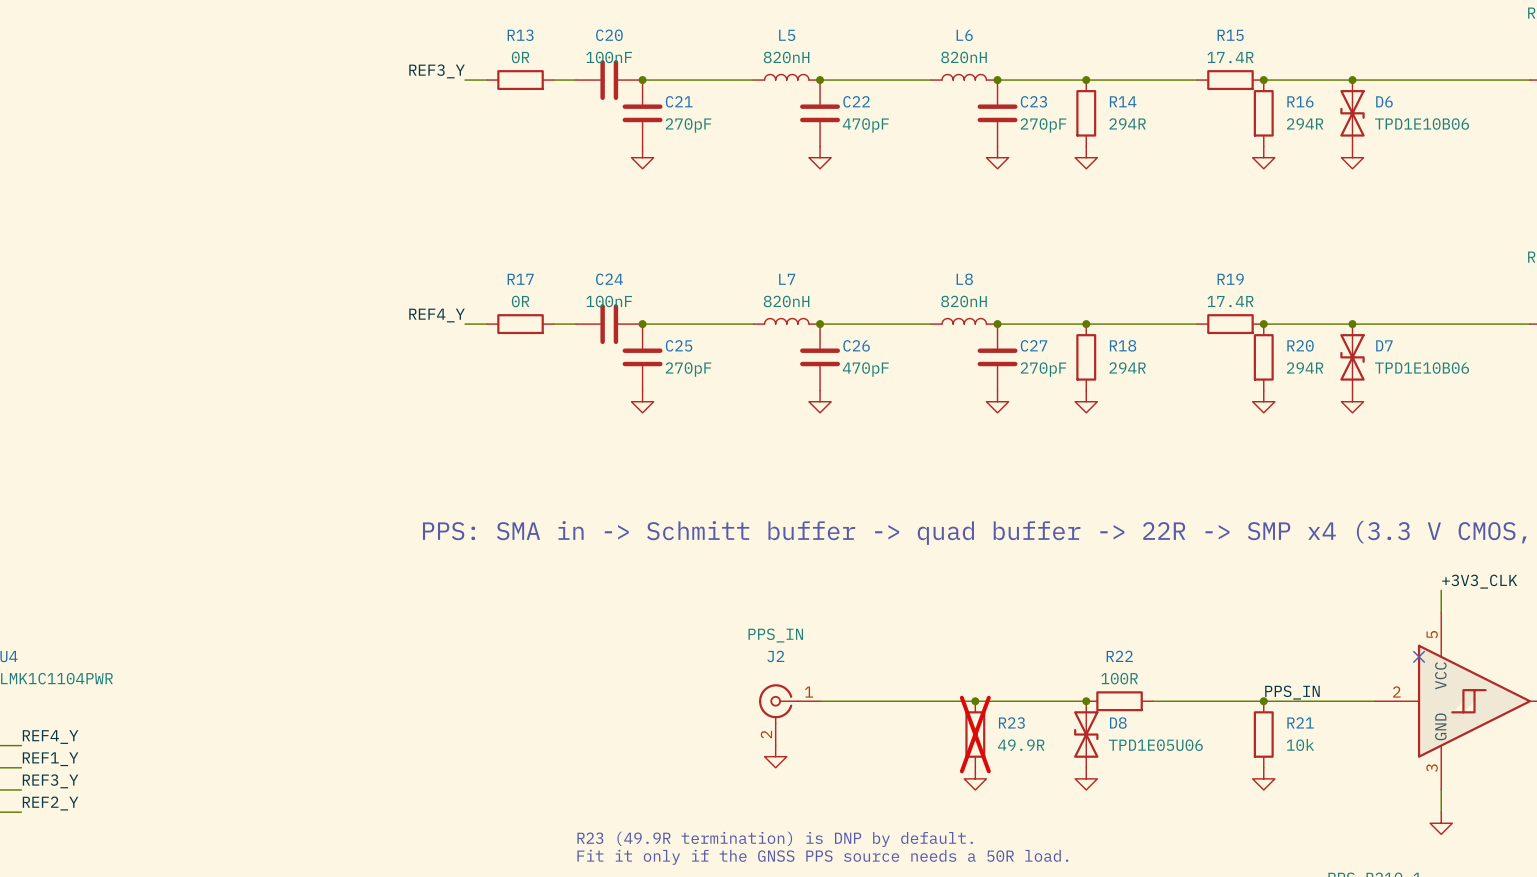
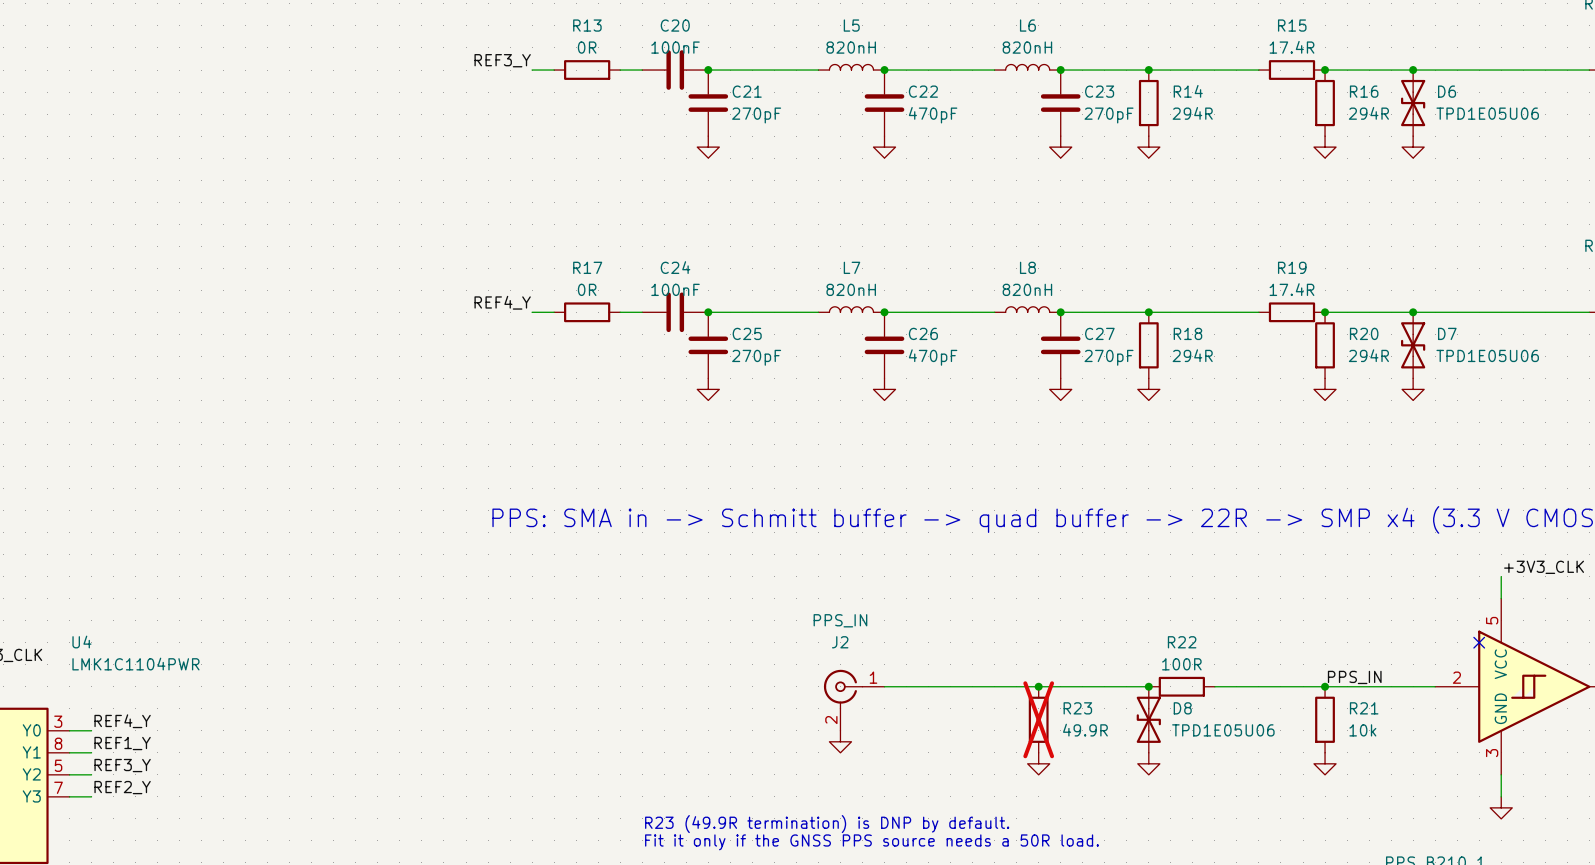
D6 value: TPD1E10B06 (1422, 124) -> TPD1E05U06 (1487, 113)
D7 value: TPD1E10B06 (1422, 368) -> TPD1E05U06 (1487, 355)

